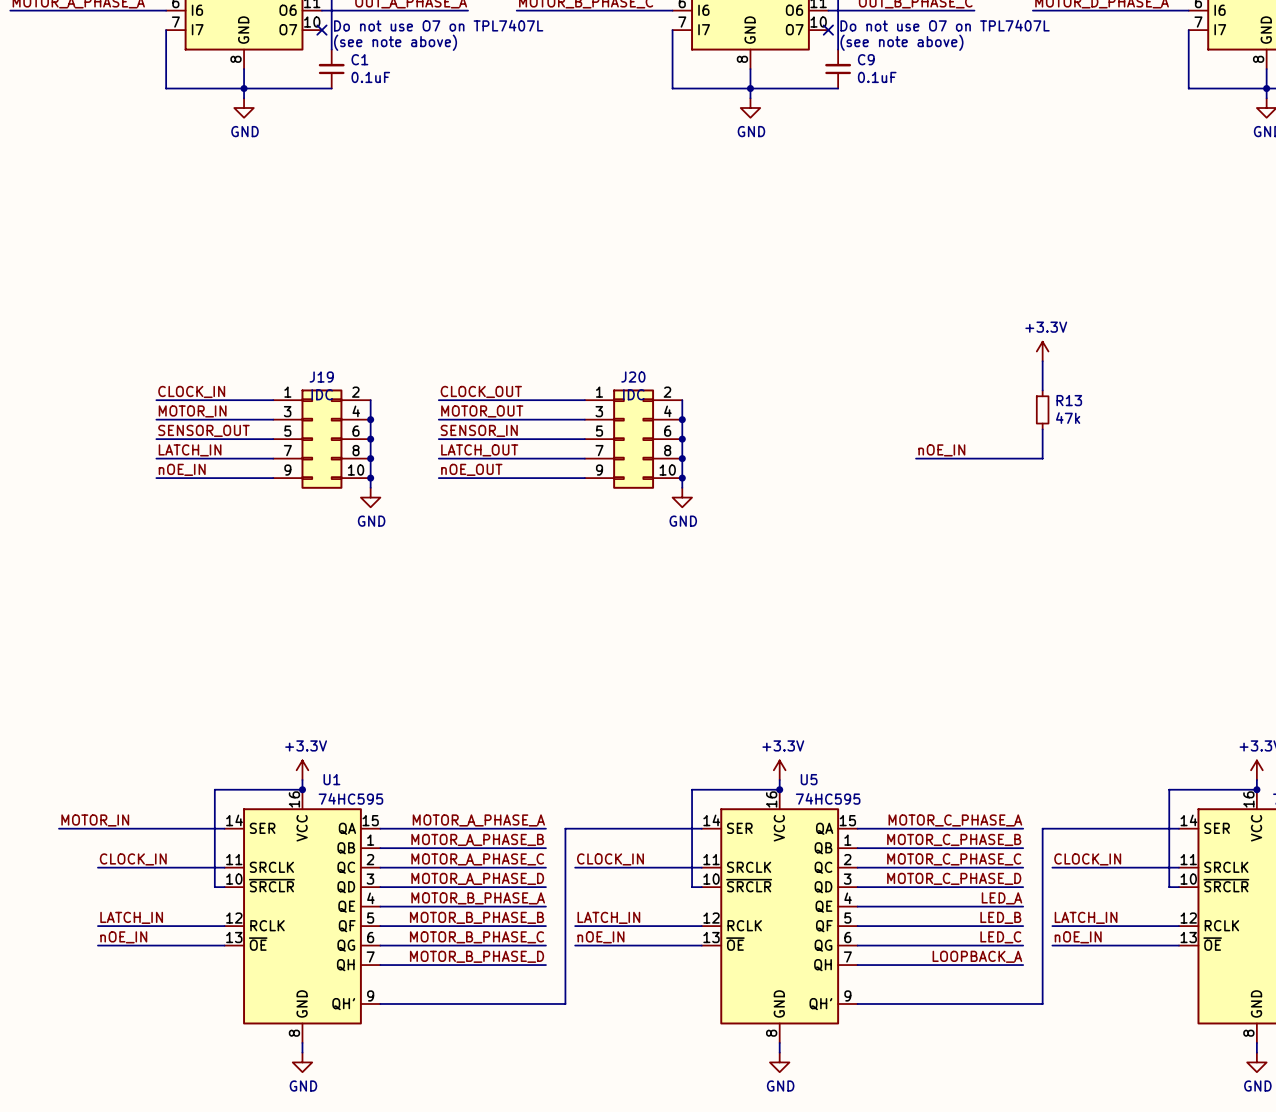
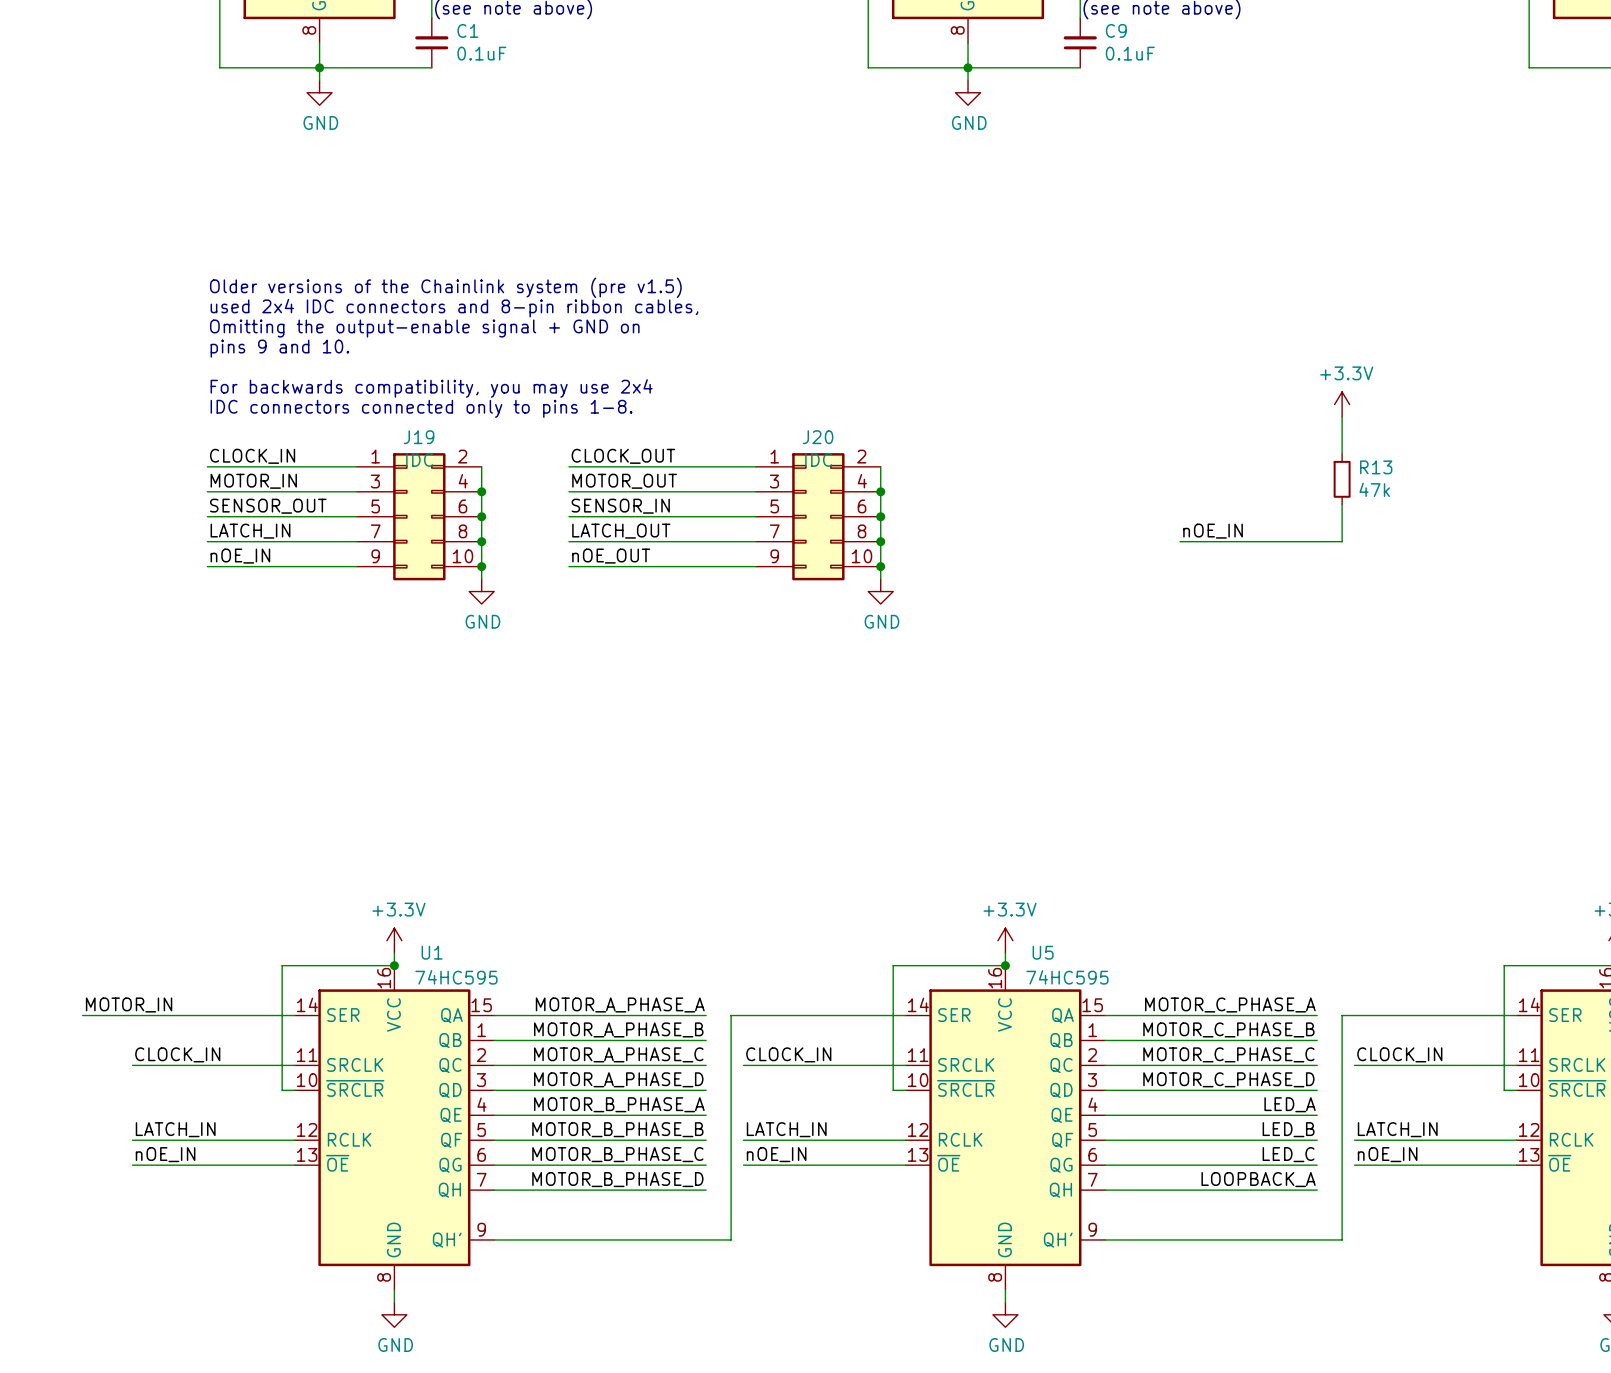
text: none -> Older versions of the Chainlink system (pre v1.5) (445, 287)
text: none -> used 2x4 IDC connectors and 8-pin ribbon cables, (454, 308)
text: none -> Omitting the output-enable signal + GND on (424, 328)
text: none -> pins 9 and 10. (279, 348)
text: none -> For backwards compatibility, you may use 2x4 (431, 388)
text: none -> IDC connectors connected only to pins 1-8. (421, 408)

